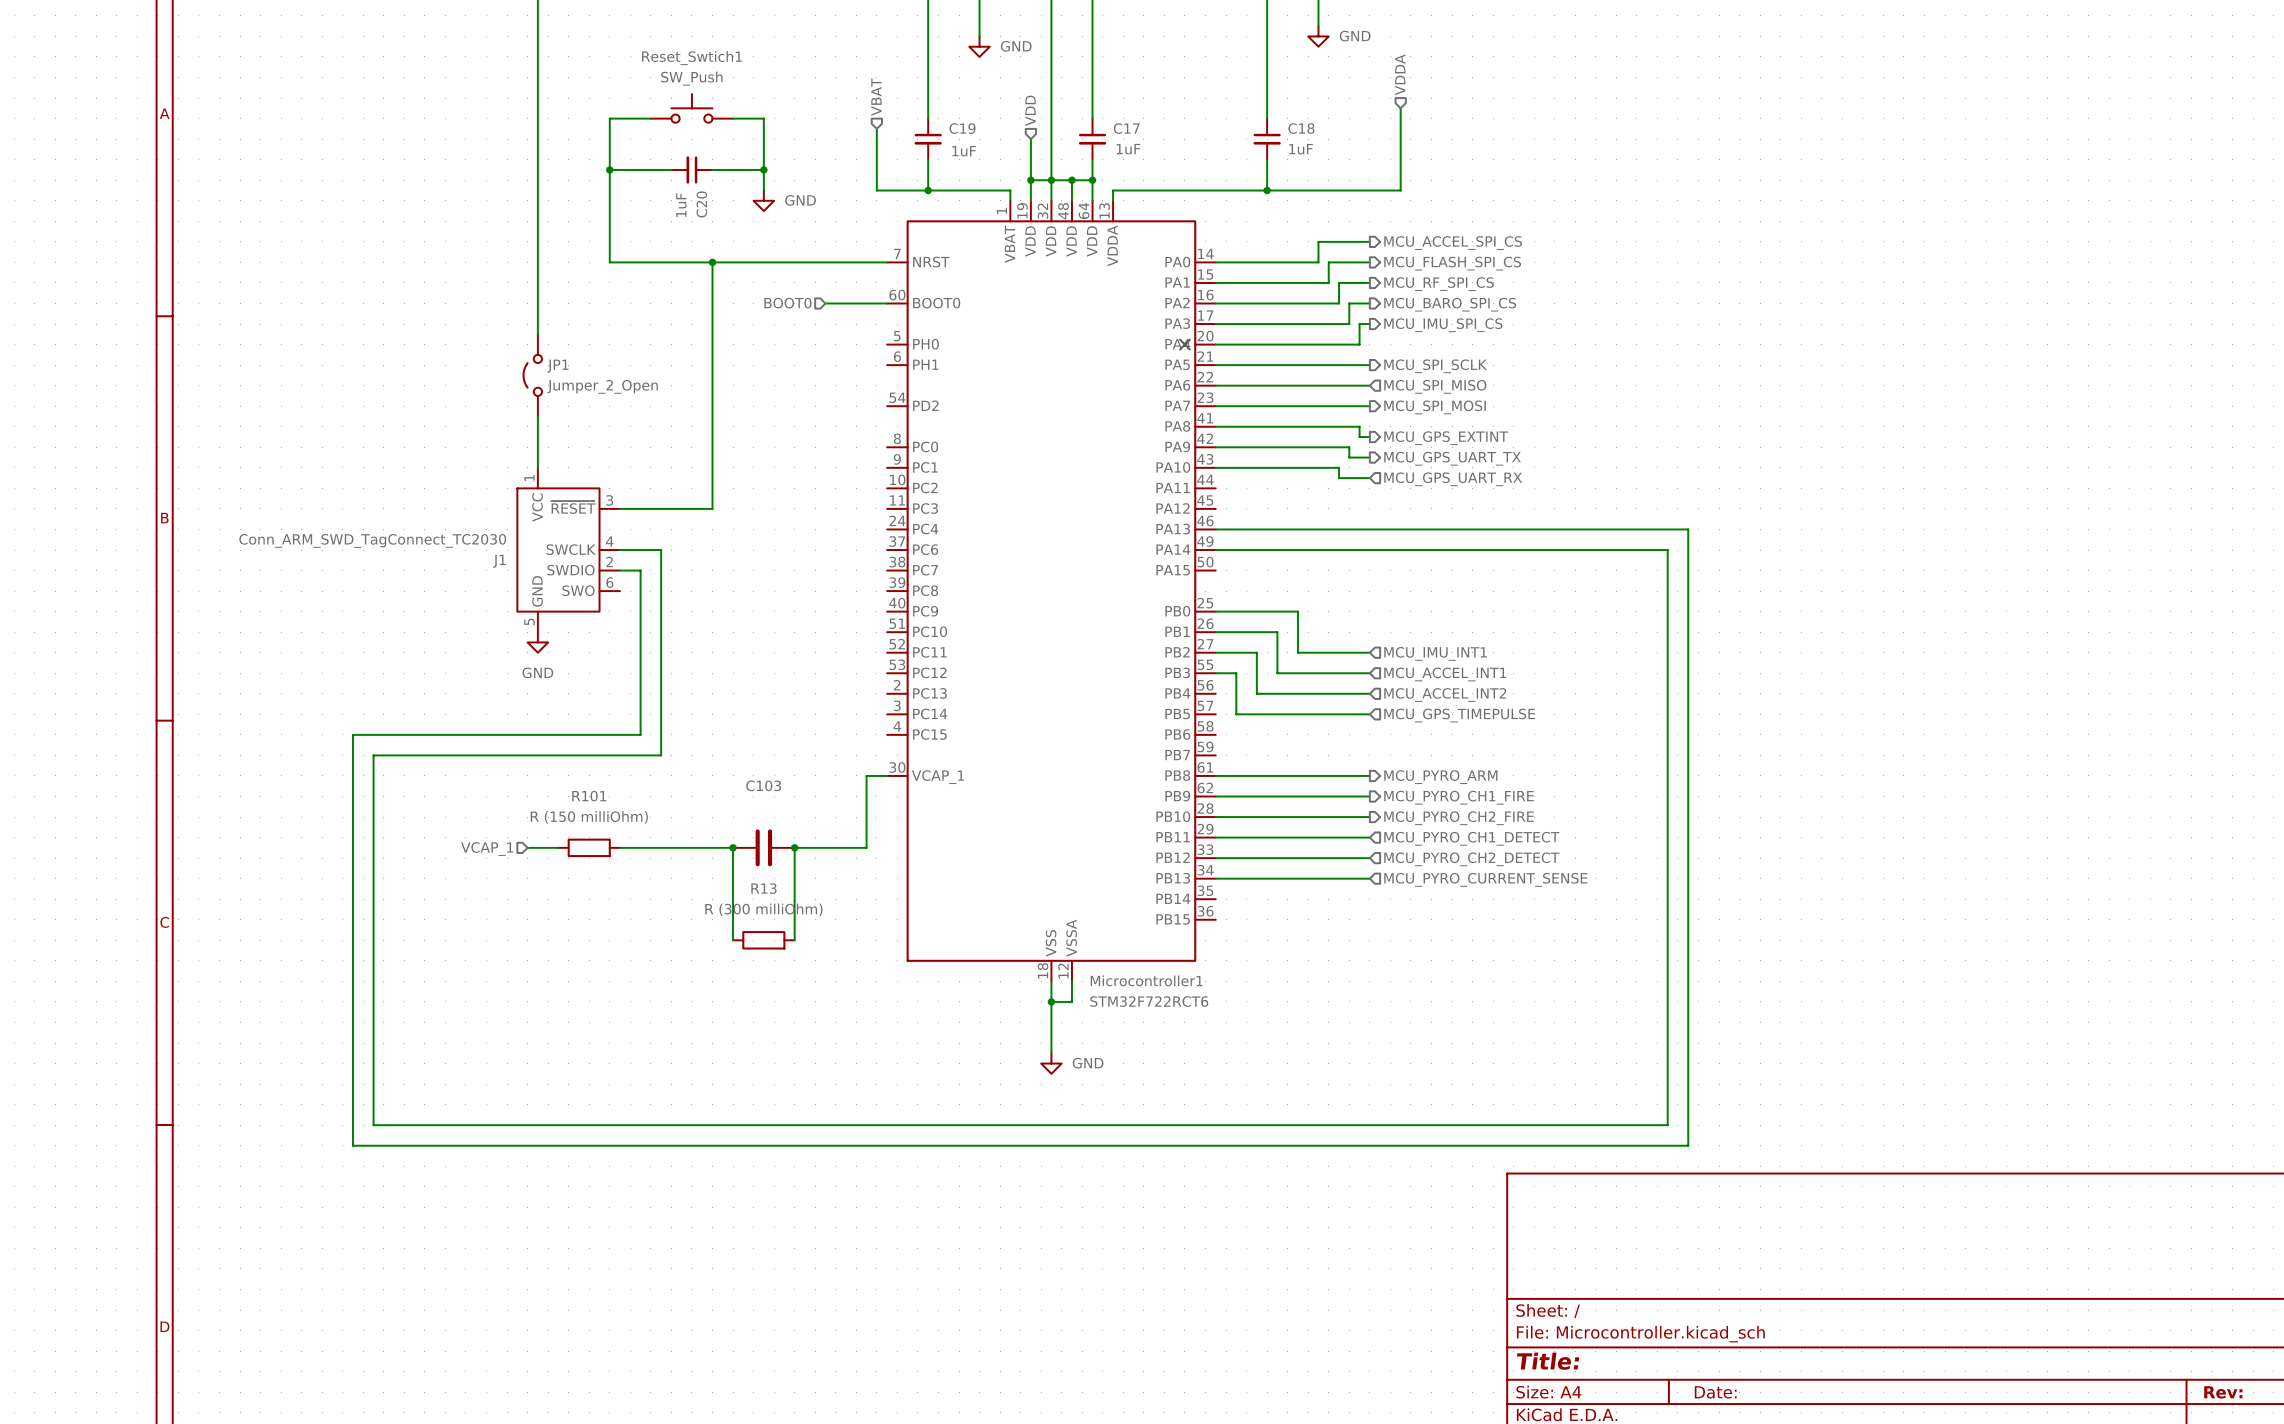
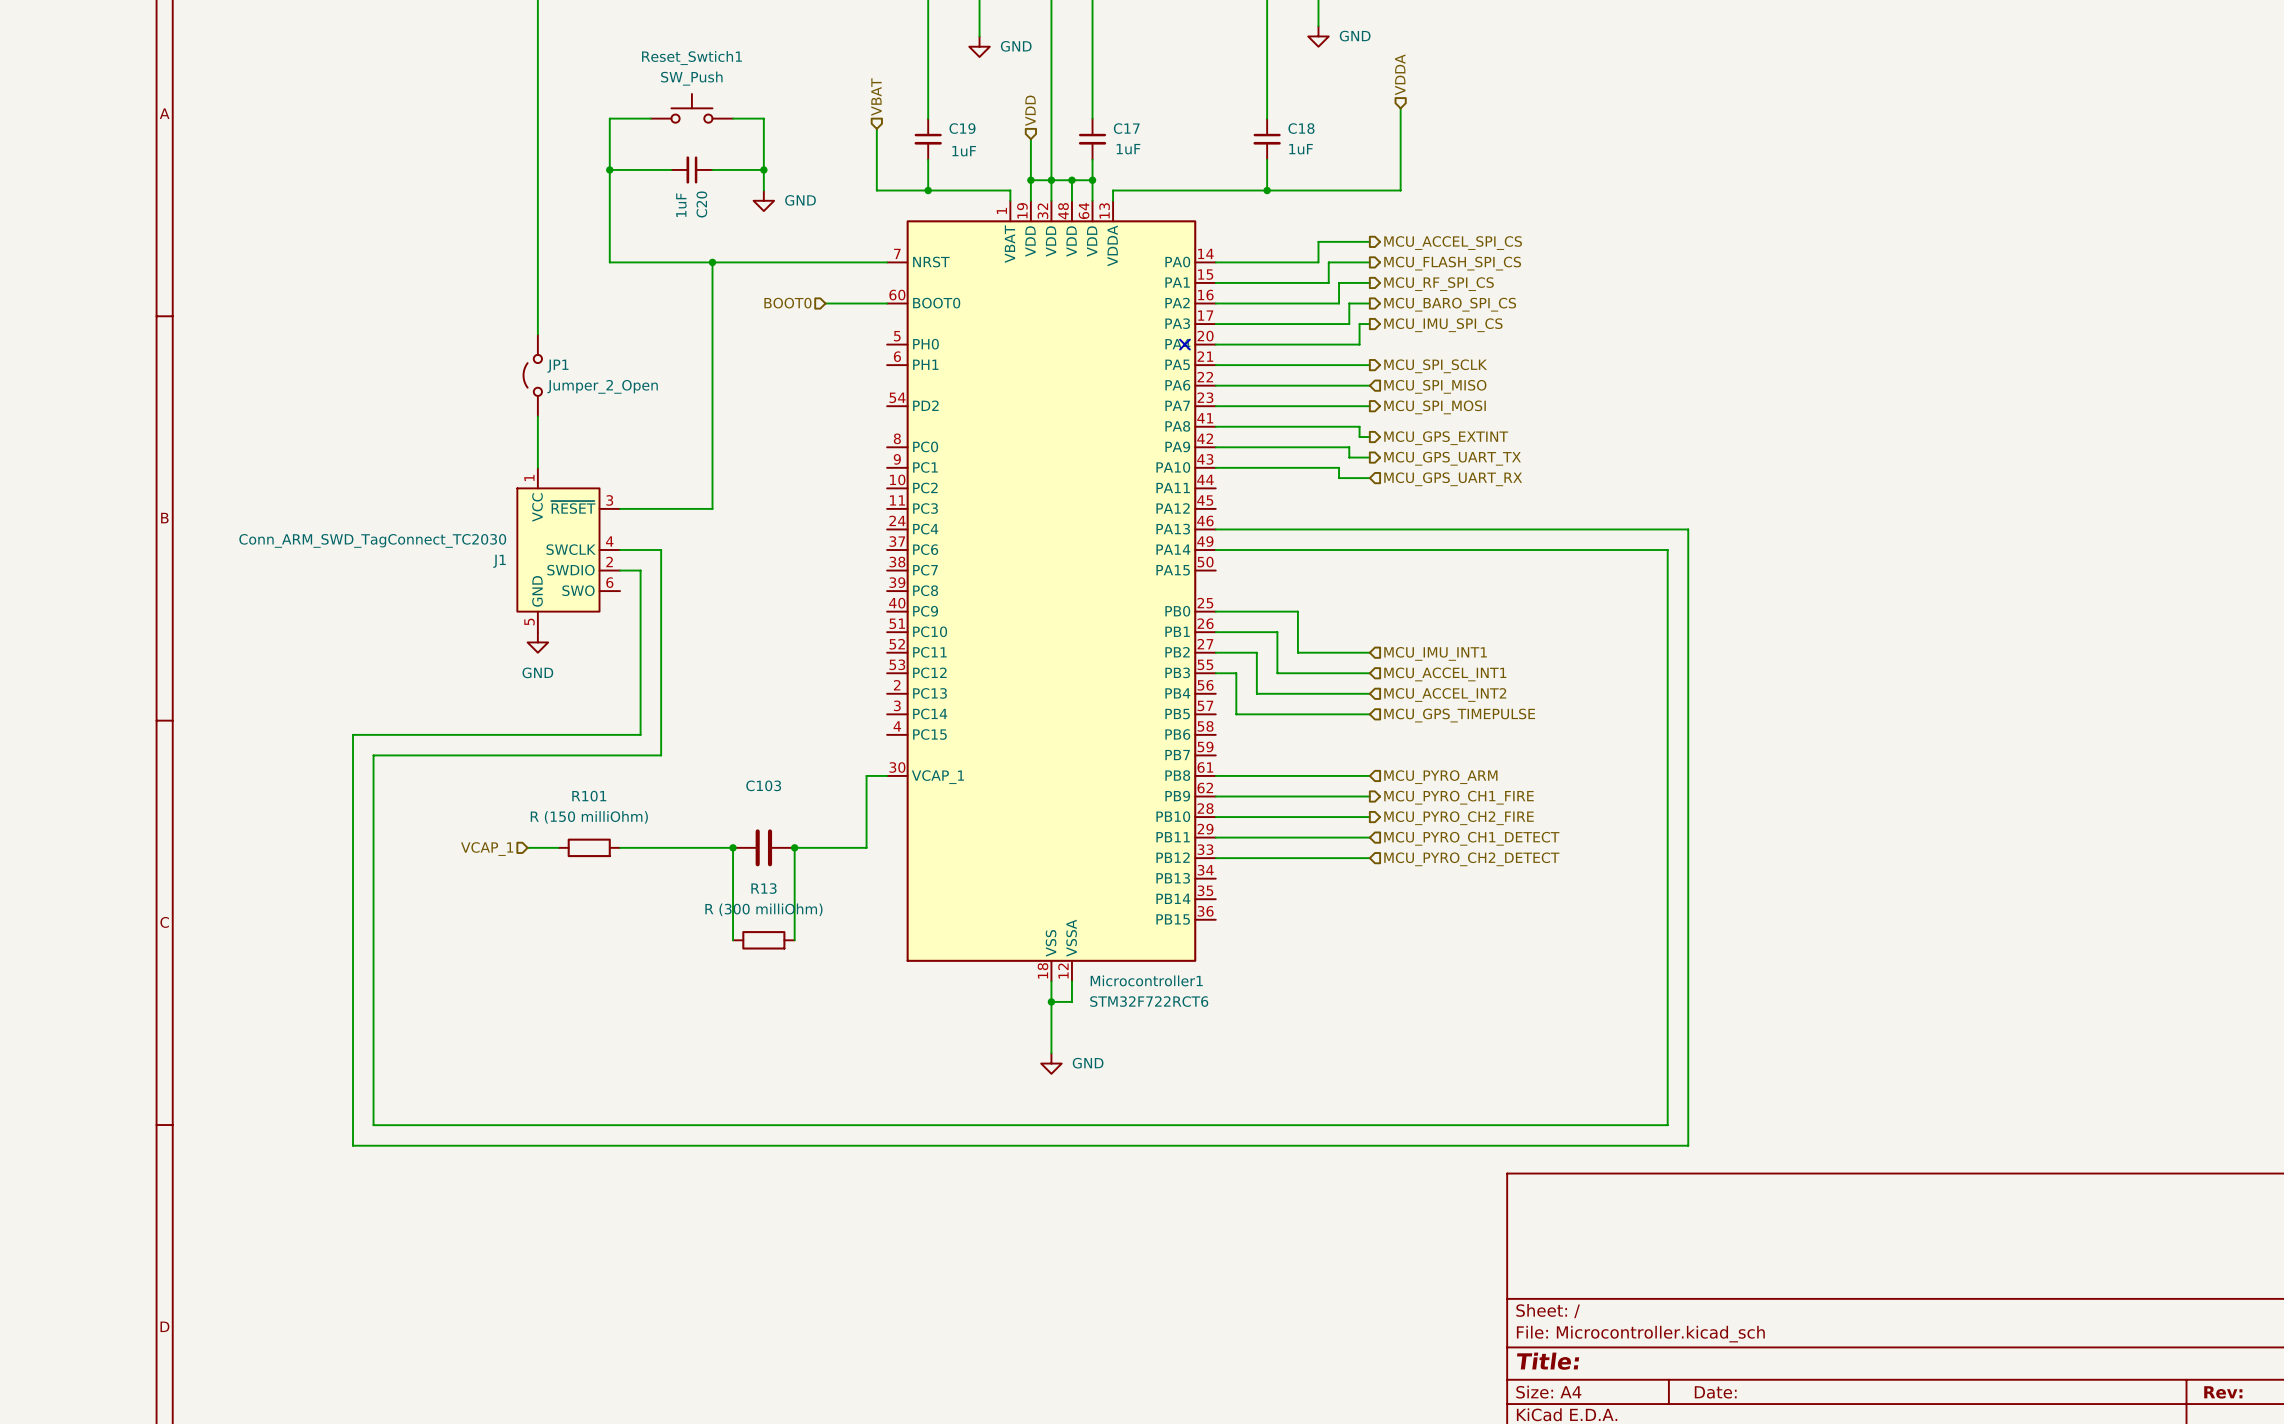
hierarchical label shape: output (1440, 777) -> input (1440, 777)
wire: (1215, 878) (1369, 878) -> none
hierarchical label: MCU_PYRO_CURRENT_SENSE (1485, 879) -> none

